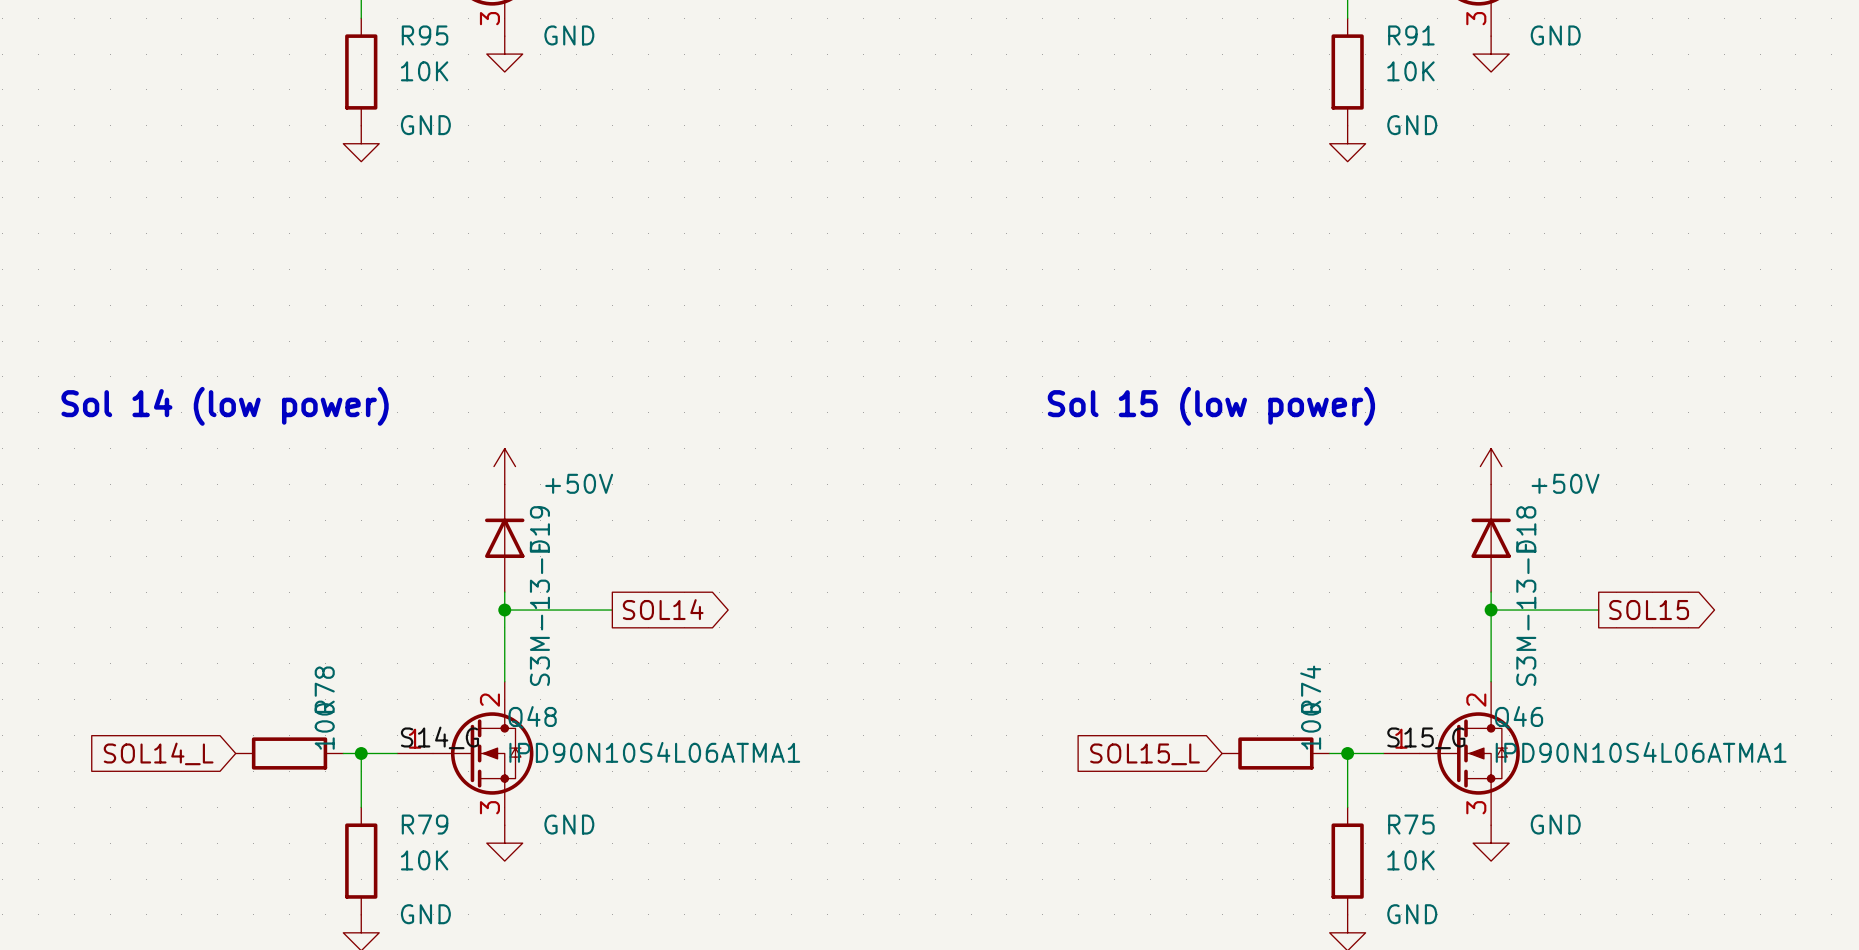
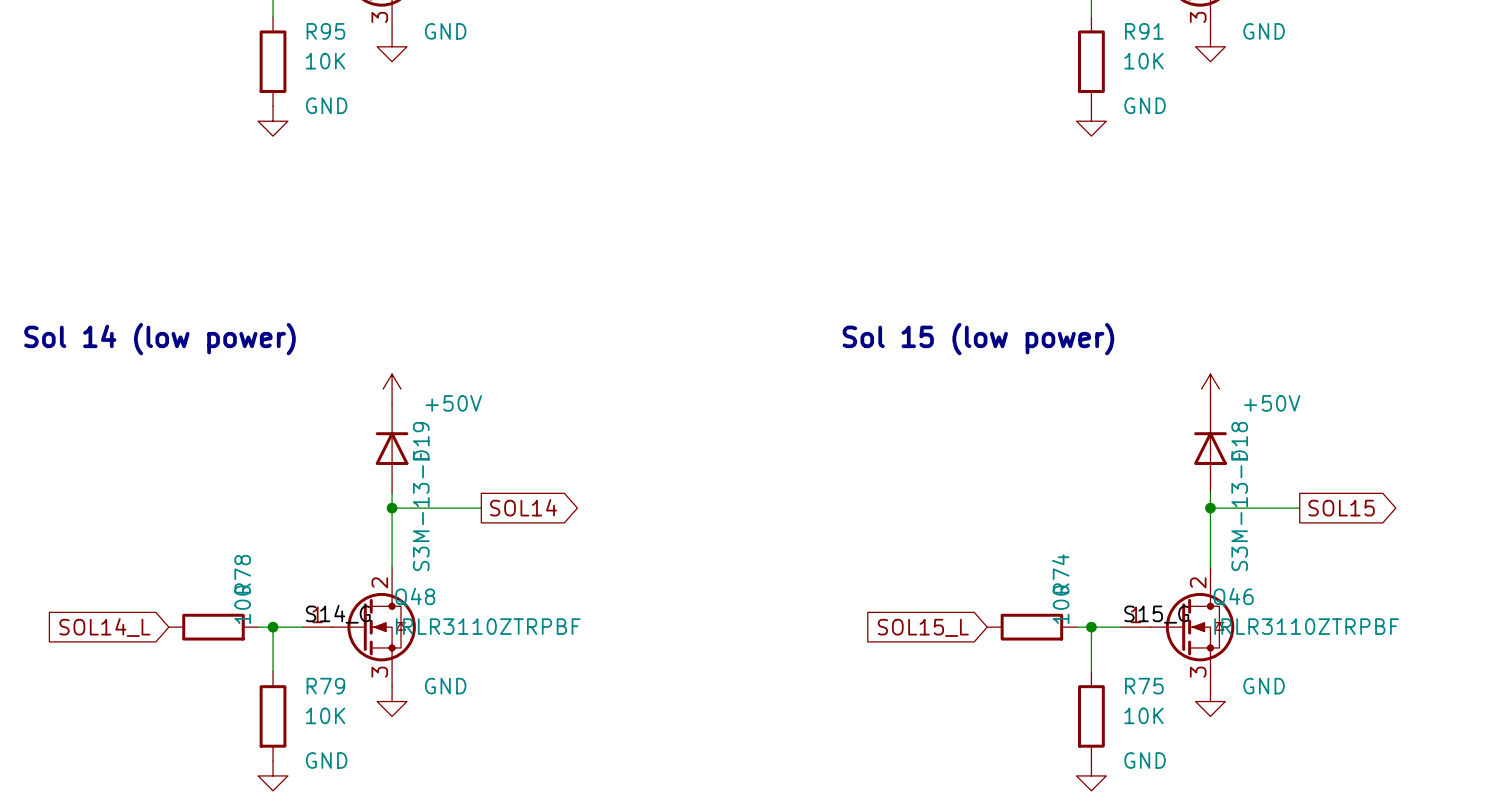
Q48 value: IPD90N10S4L06ATMA1 (654, 752) -> IRLR3110ZTRPBF (488, 626)
Q46 value: IPD90N10S4L06ATMA1 (1641, 752) -> IRLR3110ZTRPBF (1306, 626)

